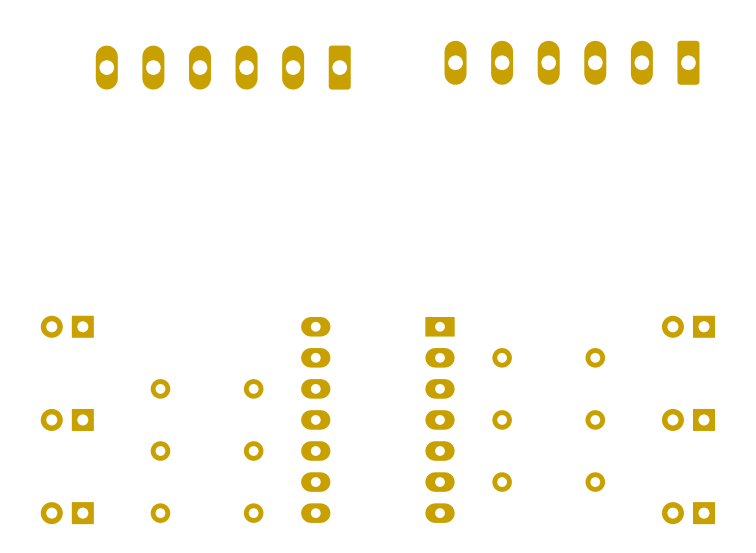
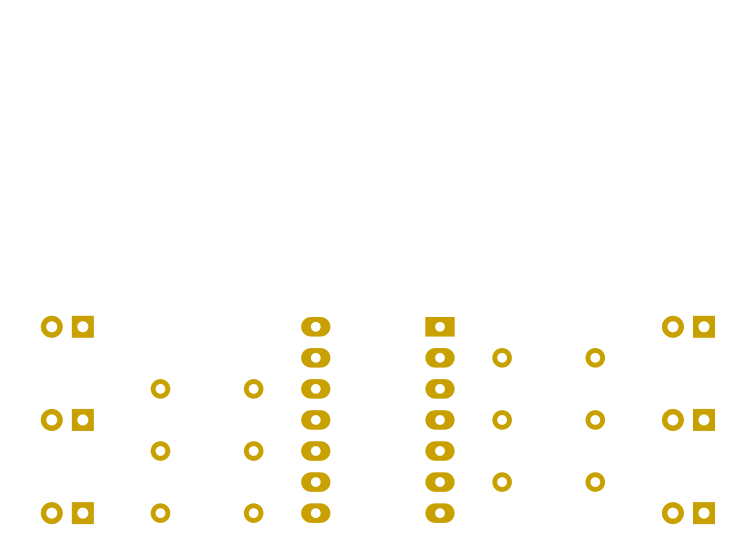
part: (572, 62) -> none
part: (223, 67) -> none

